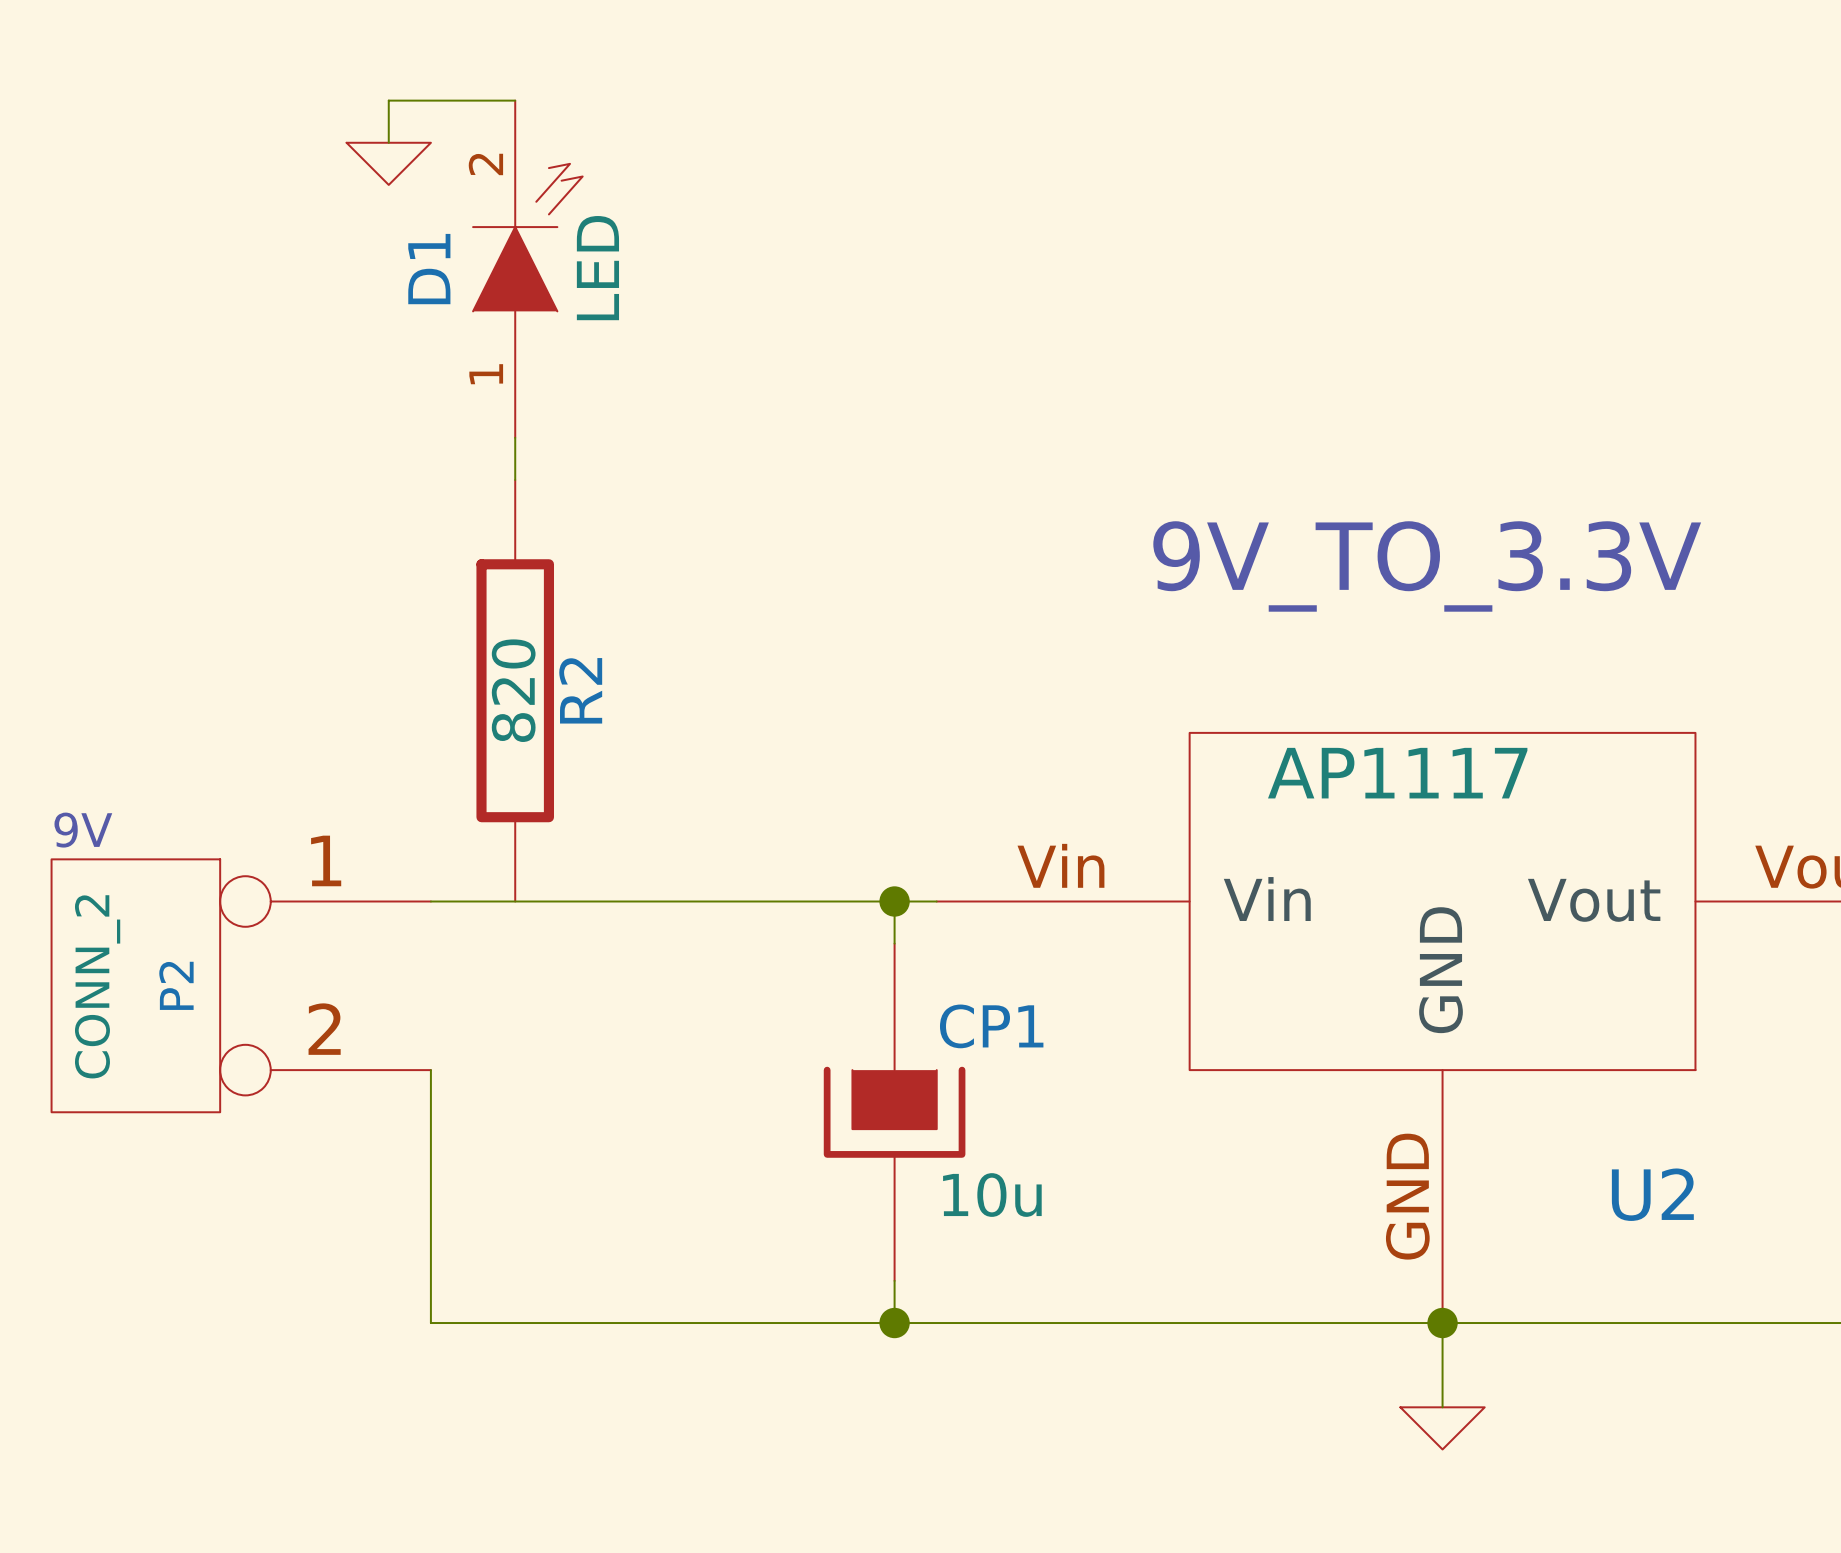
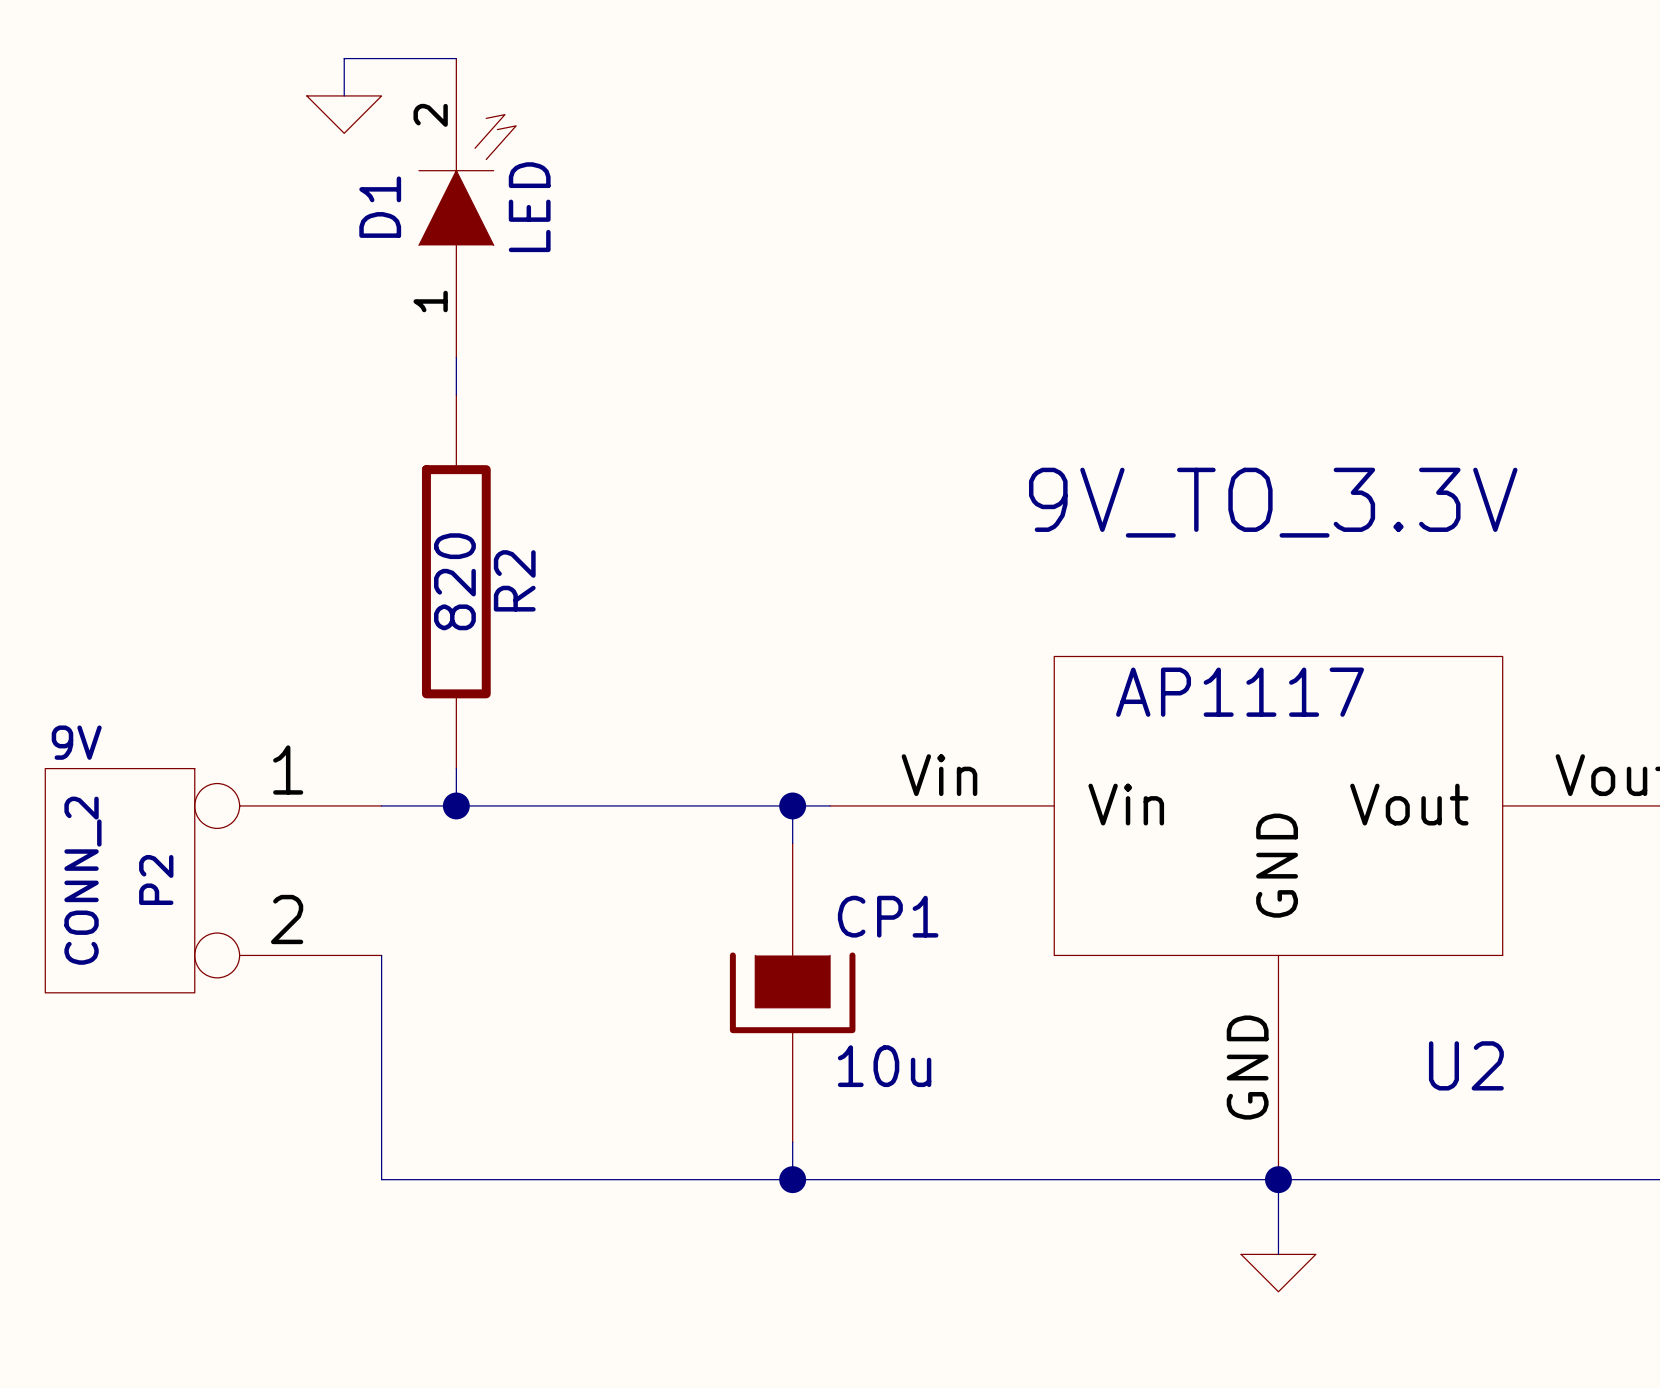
wire: (515, 100) (388, 100) (388, 142) -> (456, 58) (344, 58) (344, 95)
power symbol position: (388, 163) -> (344, 114)
D1 position: (527, 269) -> (467, 208)
R2 position: (515, 690) -> (456, 581)
junction: none -> (456, 805)

